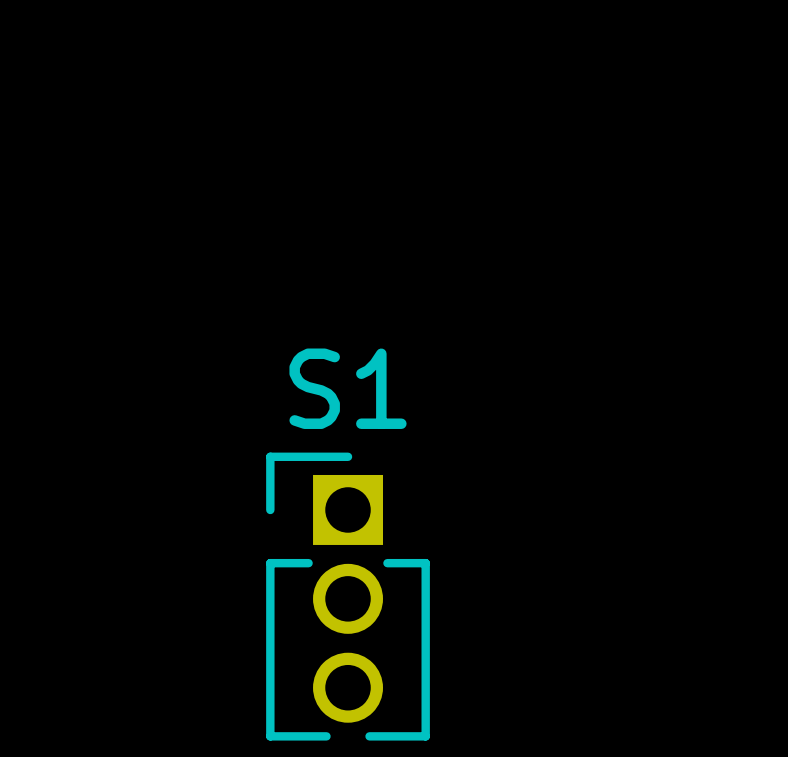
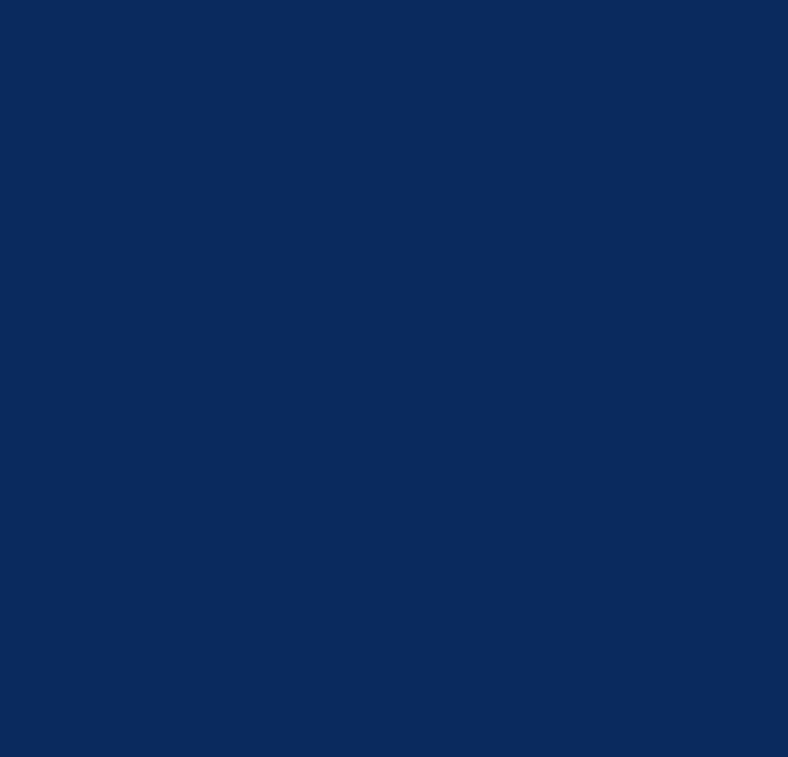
S1: (348, 596) -> none

